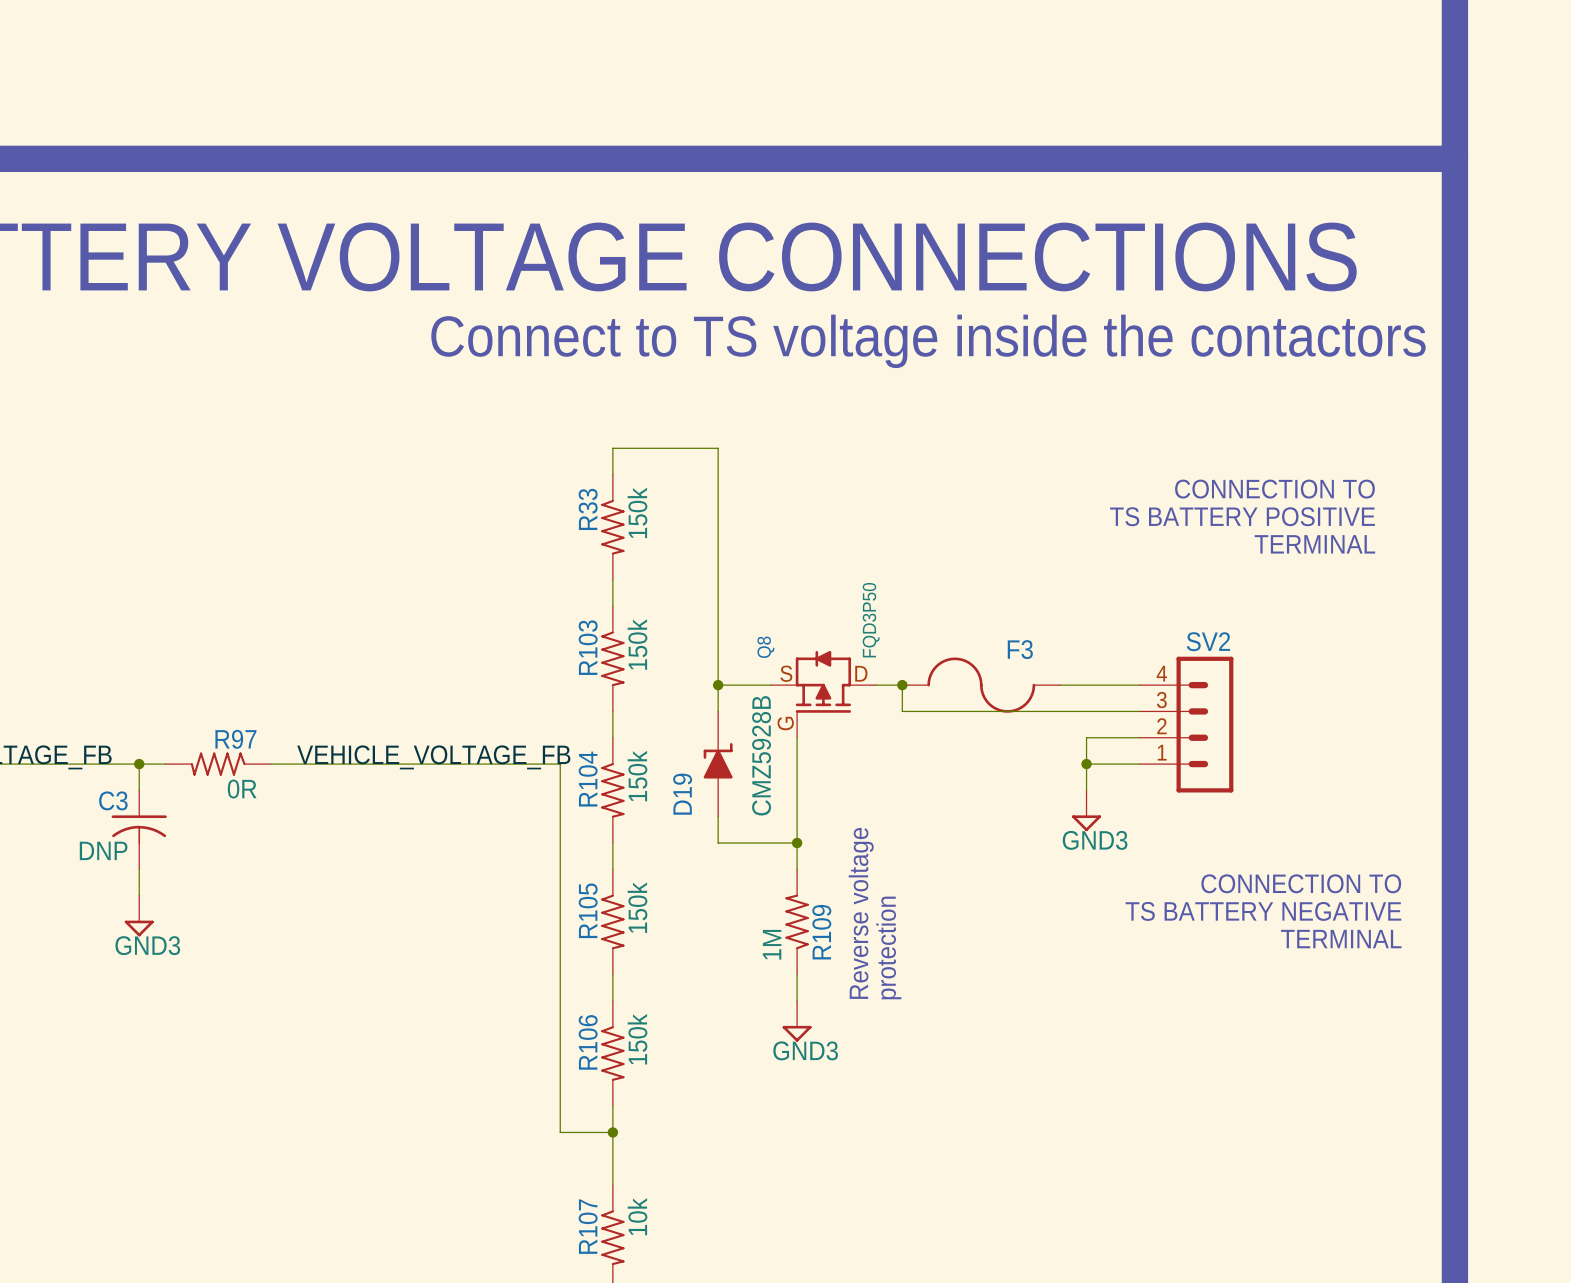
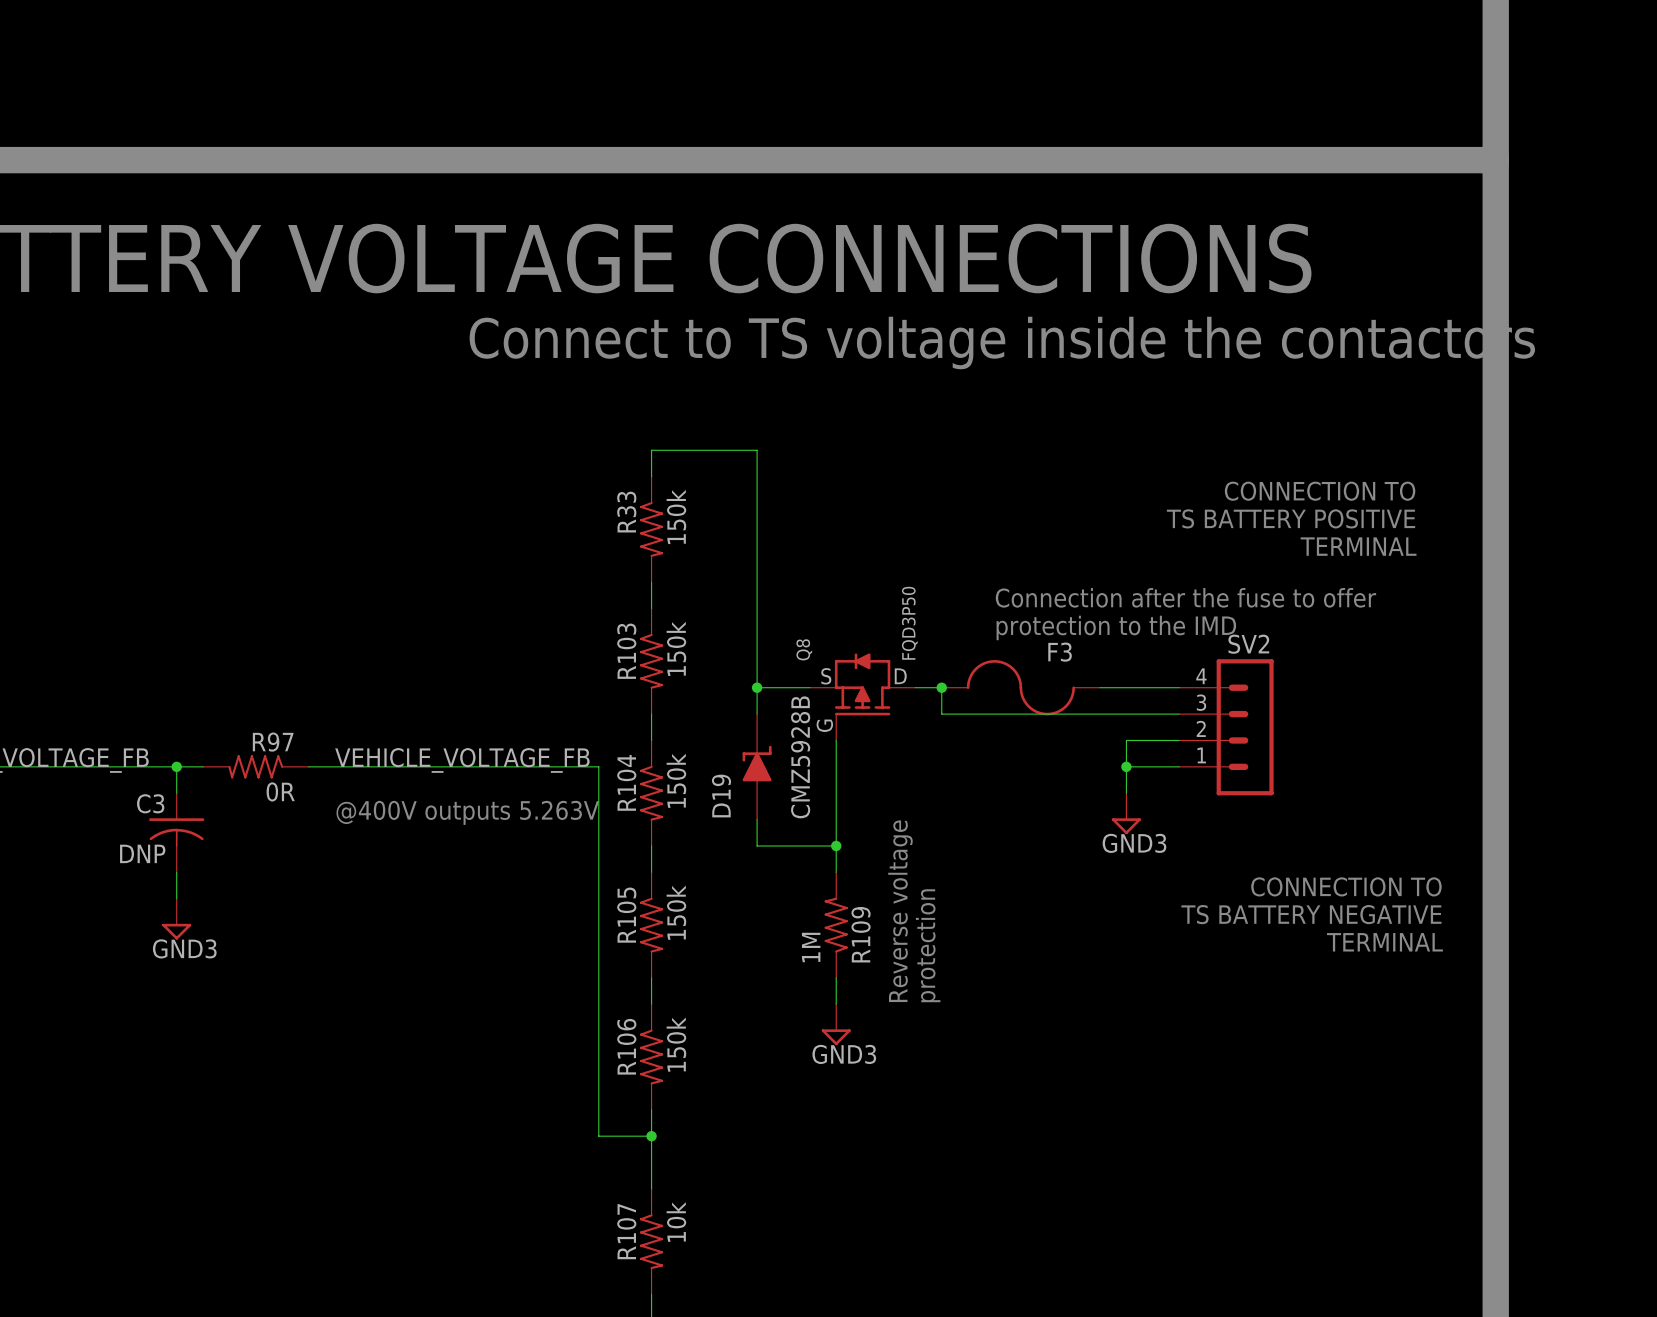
text: none -> Connection after the fuse to offer (1185, 597)
text: none -> protection to the IMD (1116, 627)
text: none -> @400V outputs 5.263V (467, 812)

